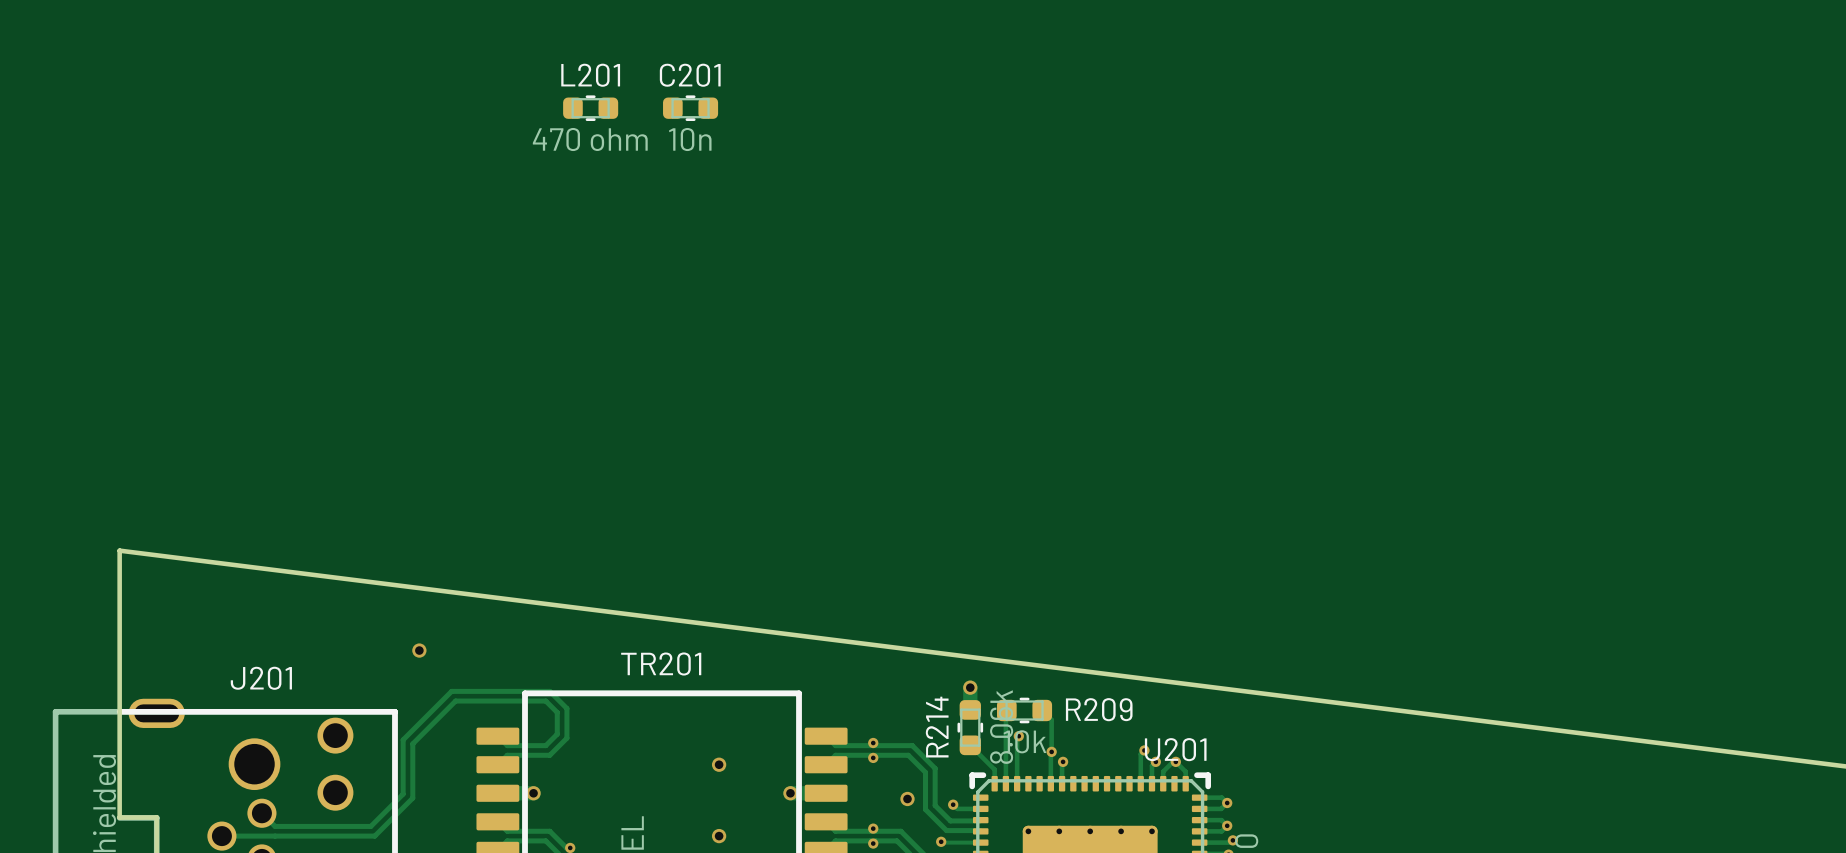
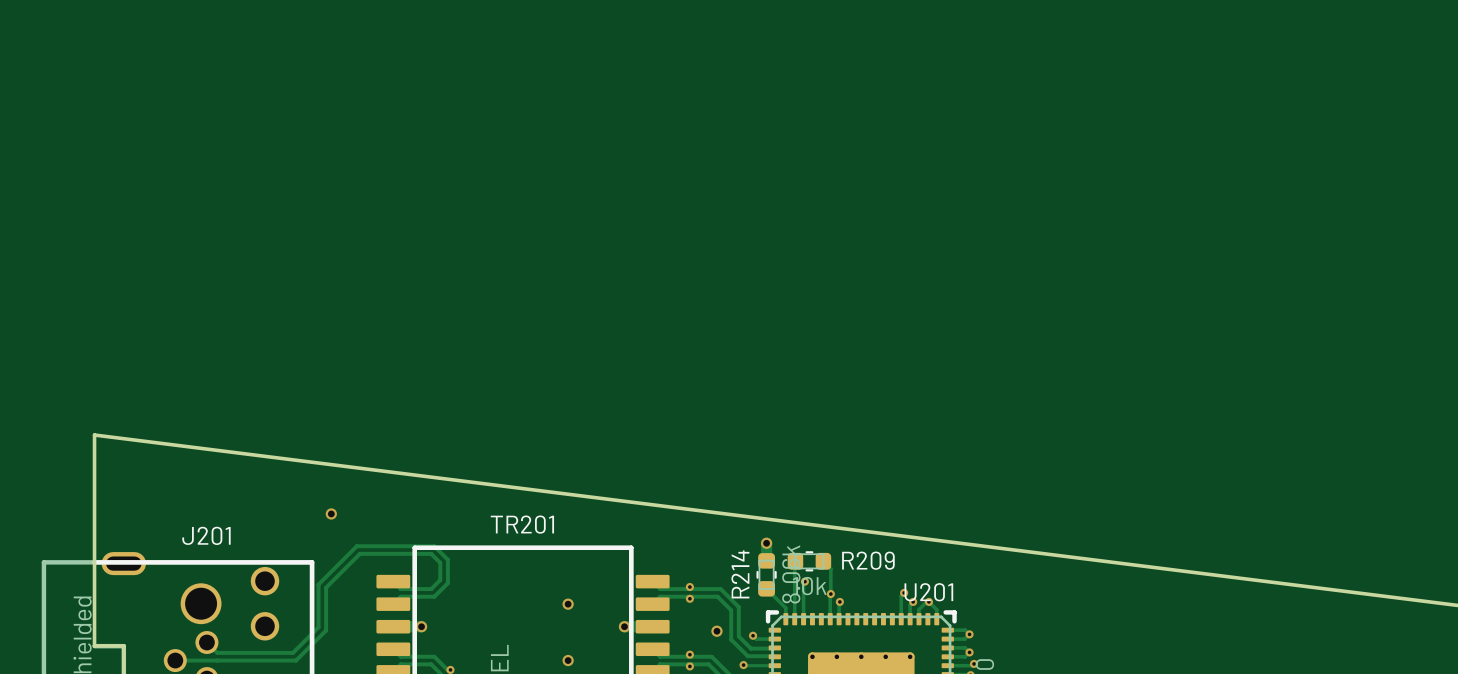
L201: 470 ohm (590, 108) -> none
C201: 10n (690, 108) -> none

